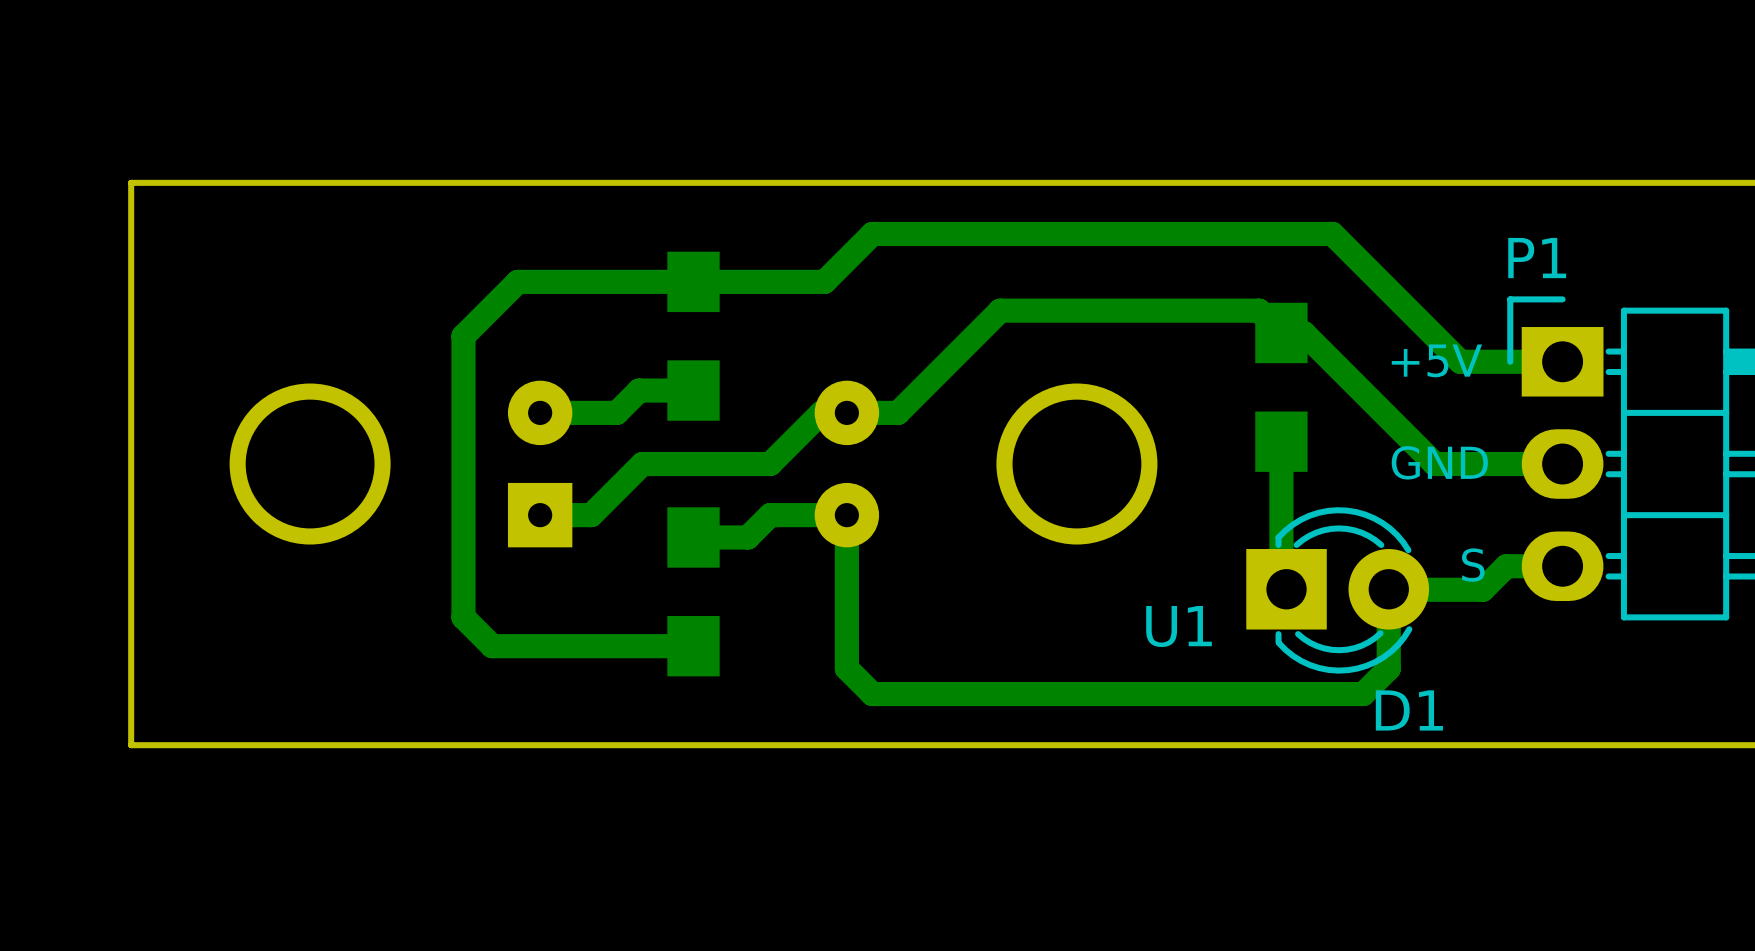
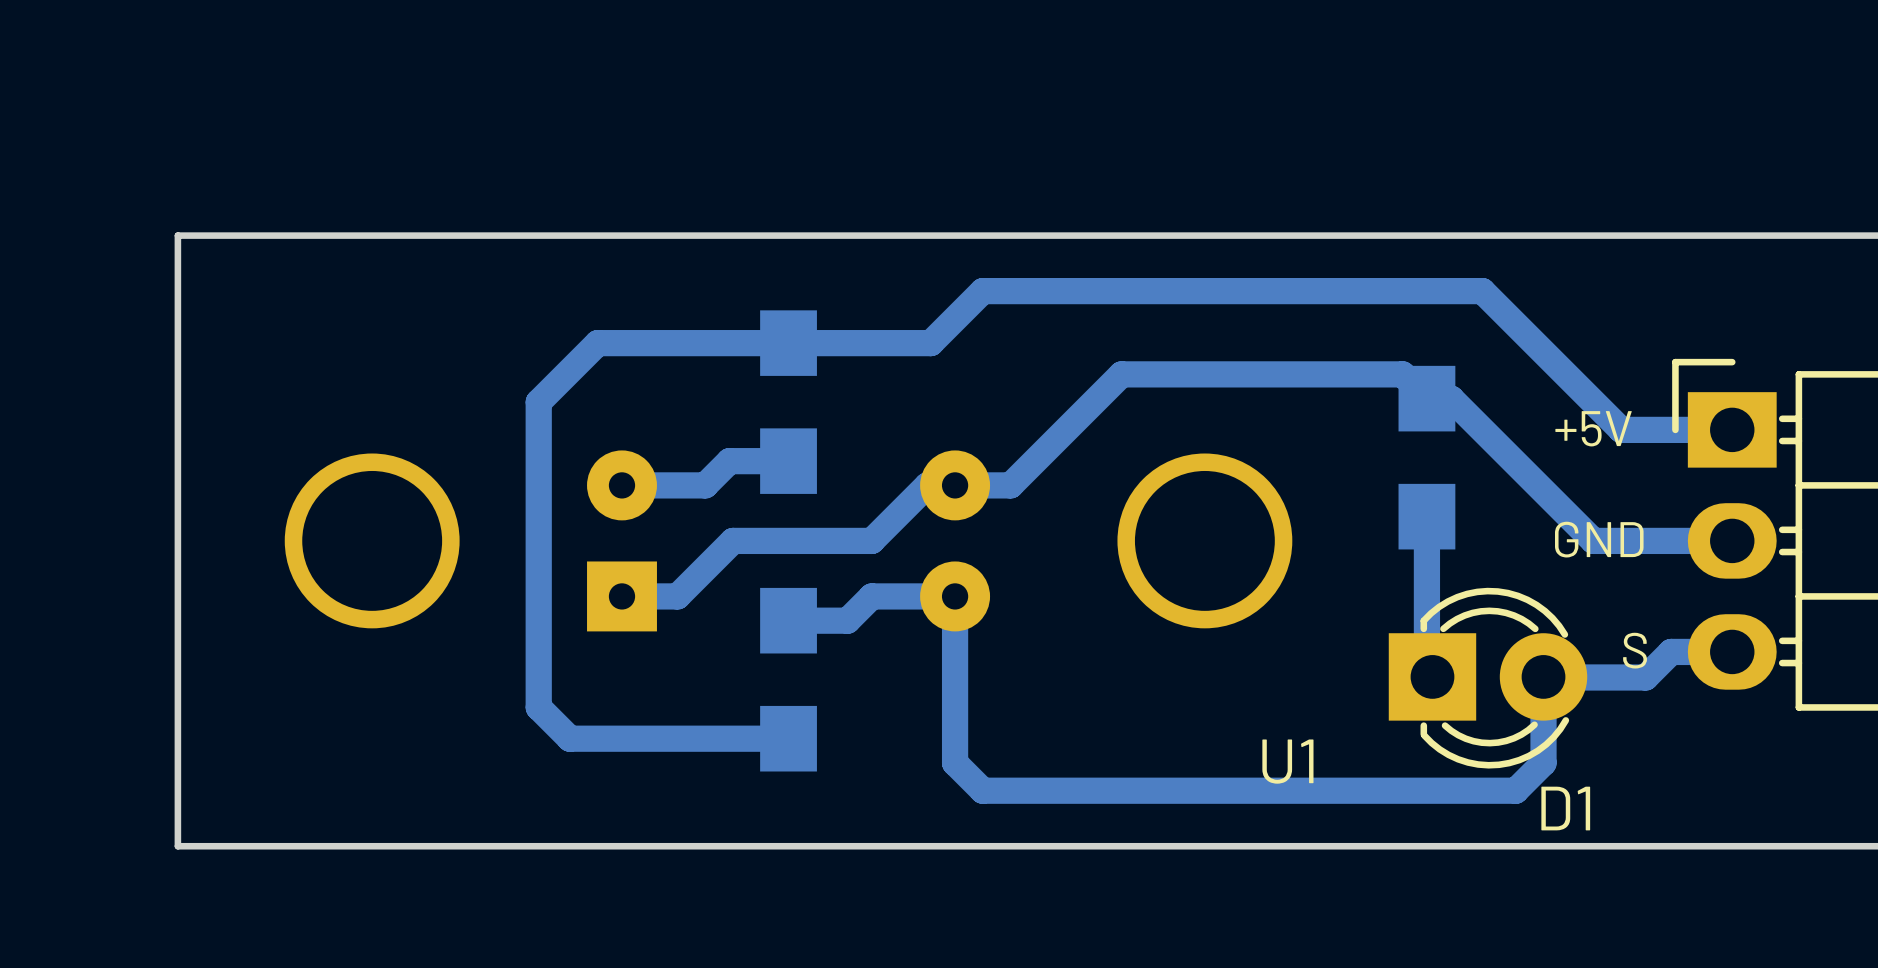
P1 name: P1 (1537, 258) -> none
U1 name position: U1 (1179, 626) -> U1 (1287, 761)

